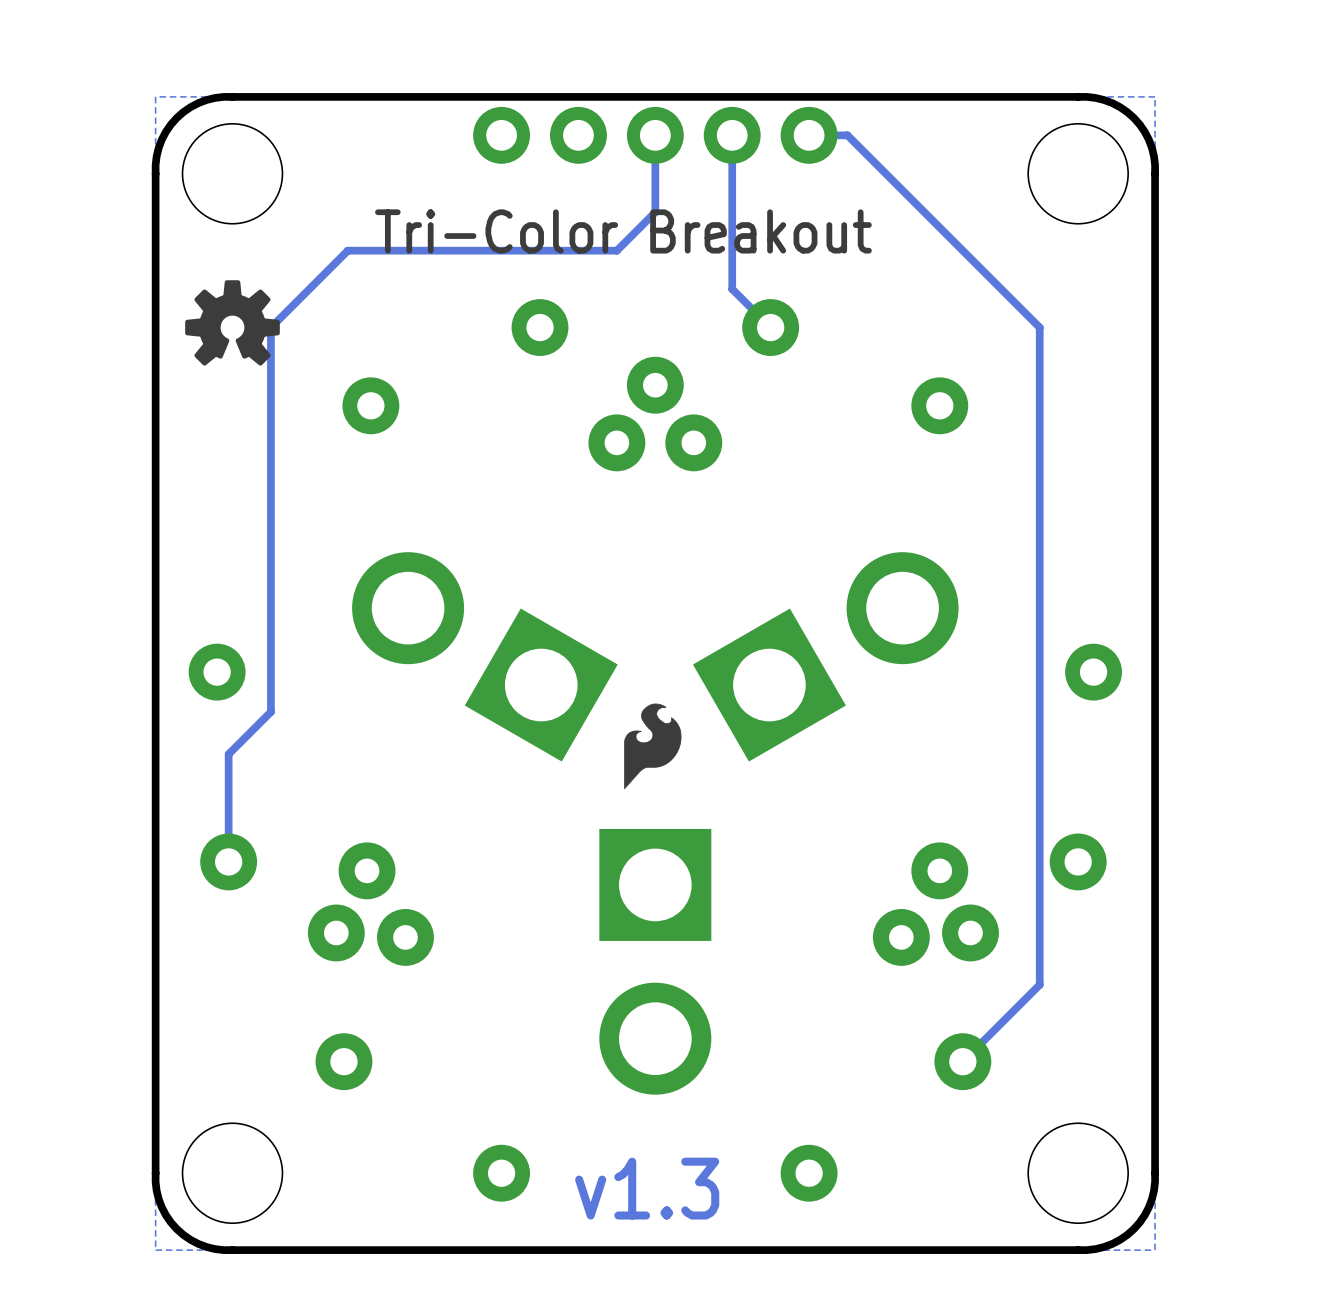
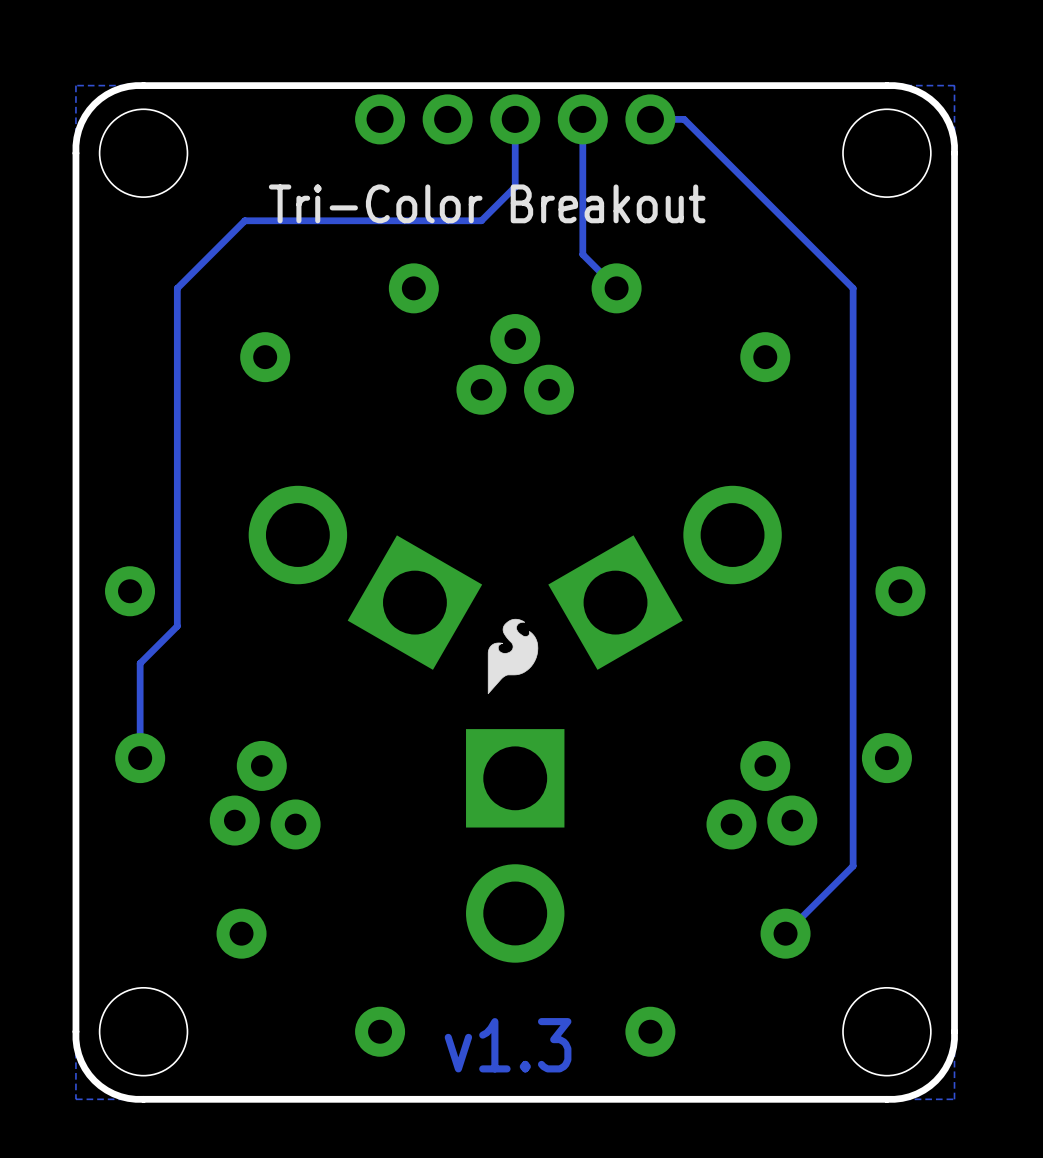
drawing: [185, 280, 280, 366] -> none

